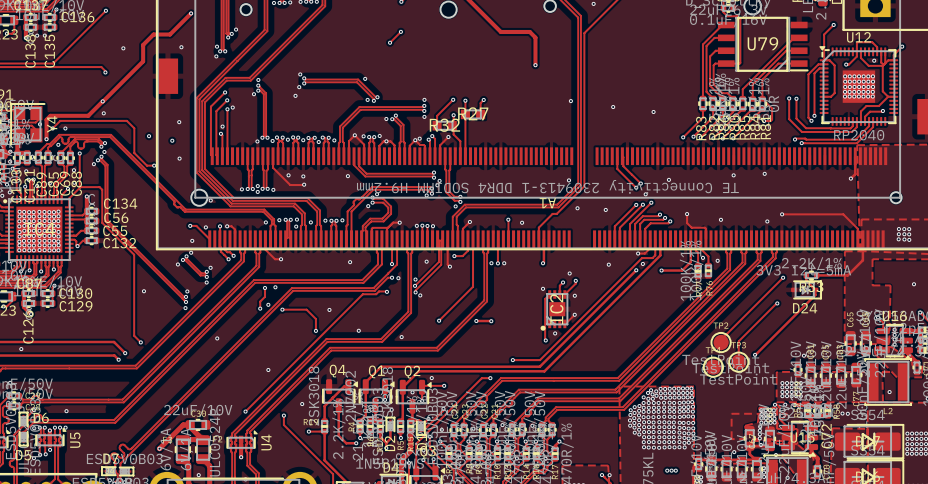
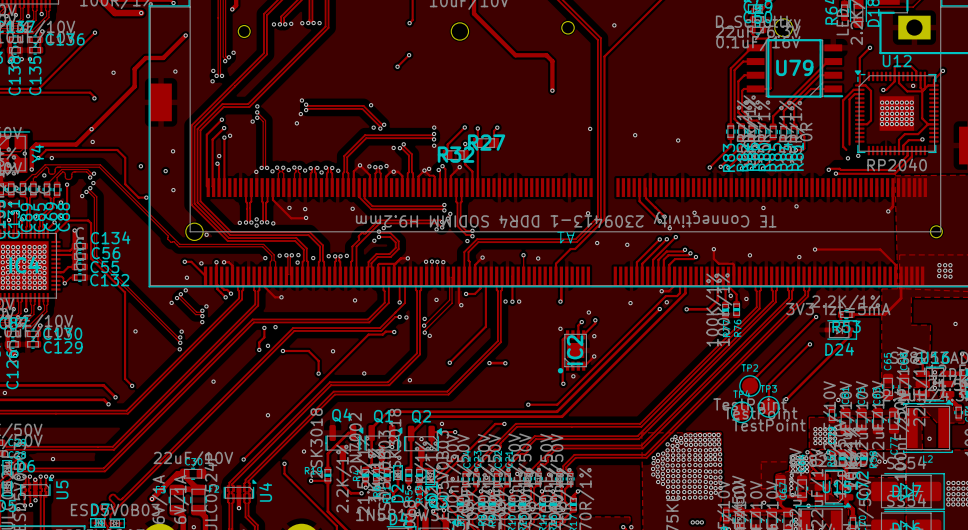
track: (789, 98) (789, 119) (801, 131) (852, 131) (856, 127) (856, 121) -> none
via: (789, 98) -> none
track: (796, 98) (796, 118) (806, 128) (850, 128) (852, 121) -> none
via: (796, 98) -> none
via: (814, 115) -> none
via: (811, 120) -> none
via: none -> (858, 155)
via: none -> (847, 158)

